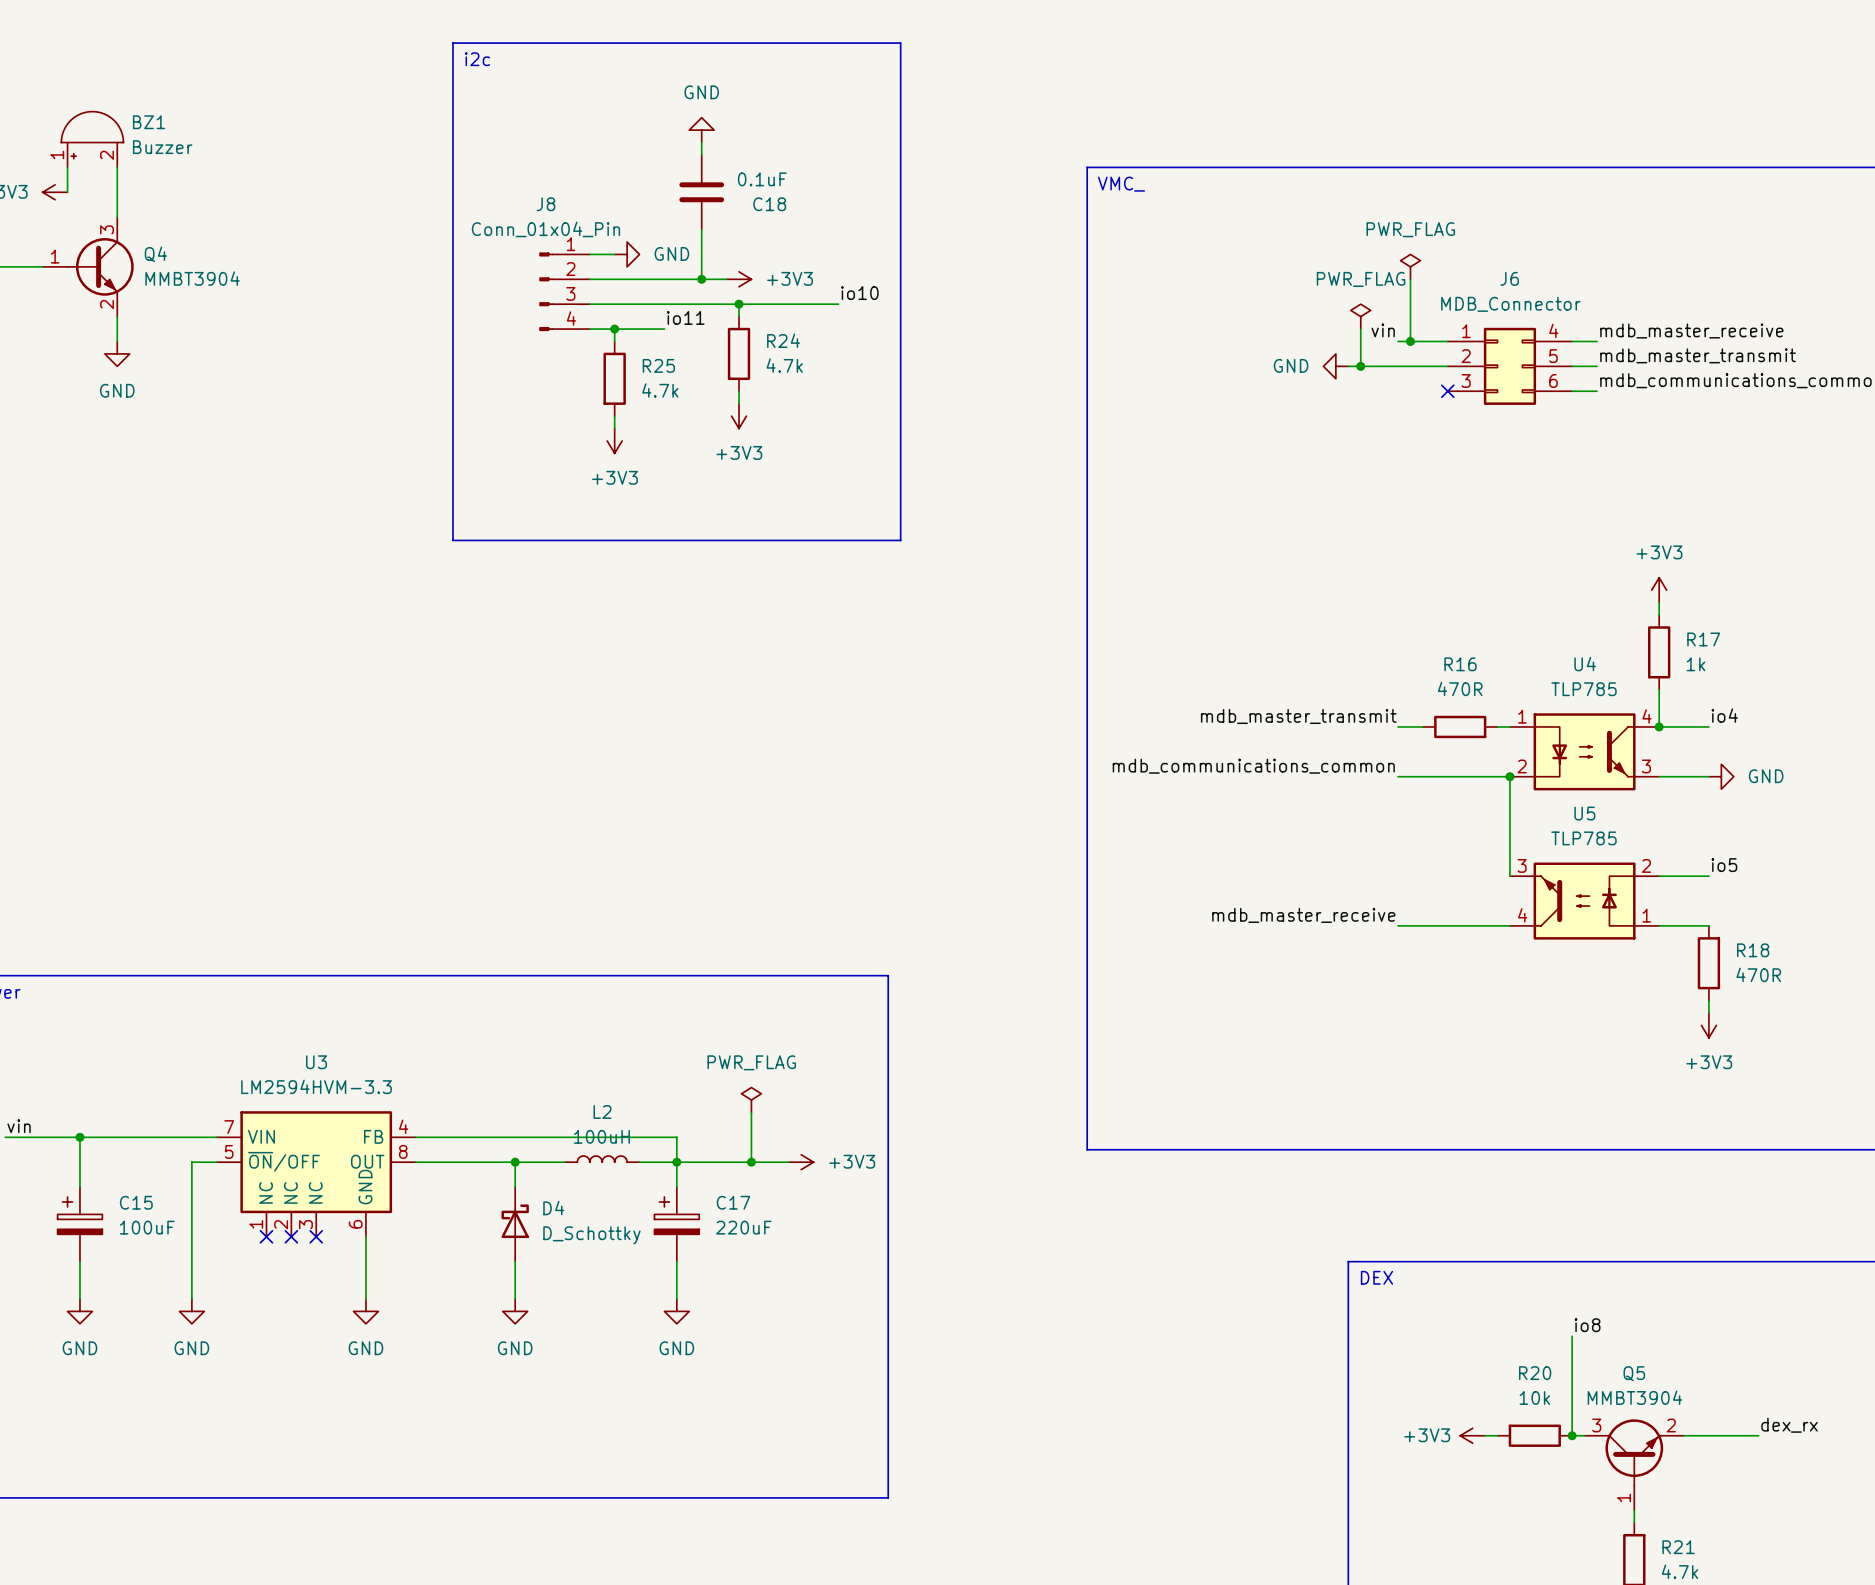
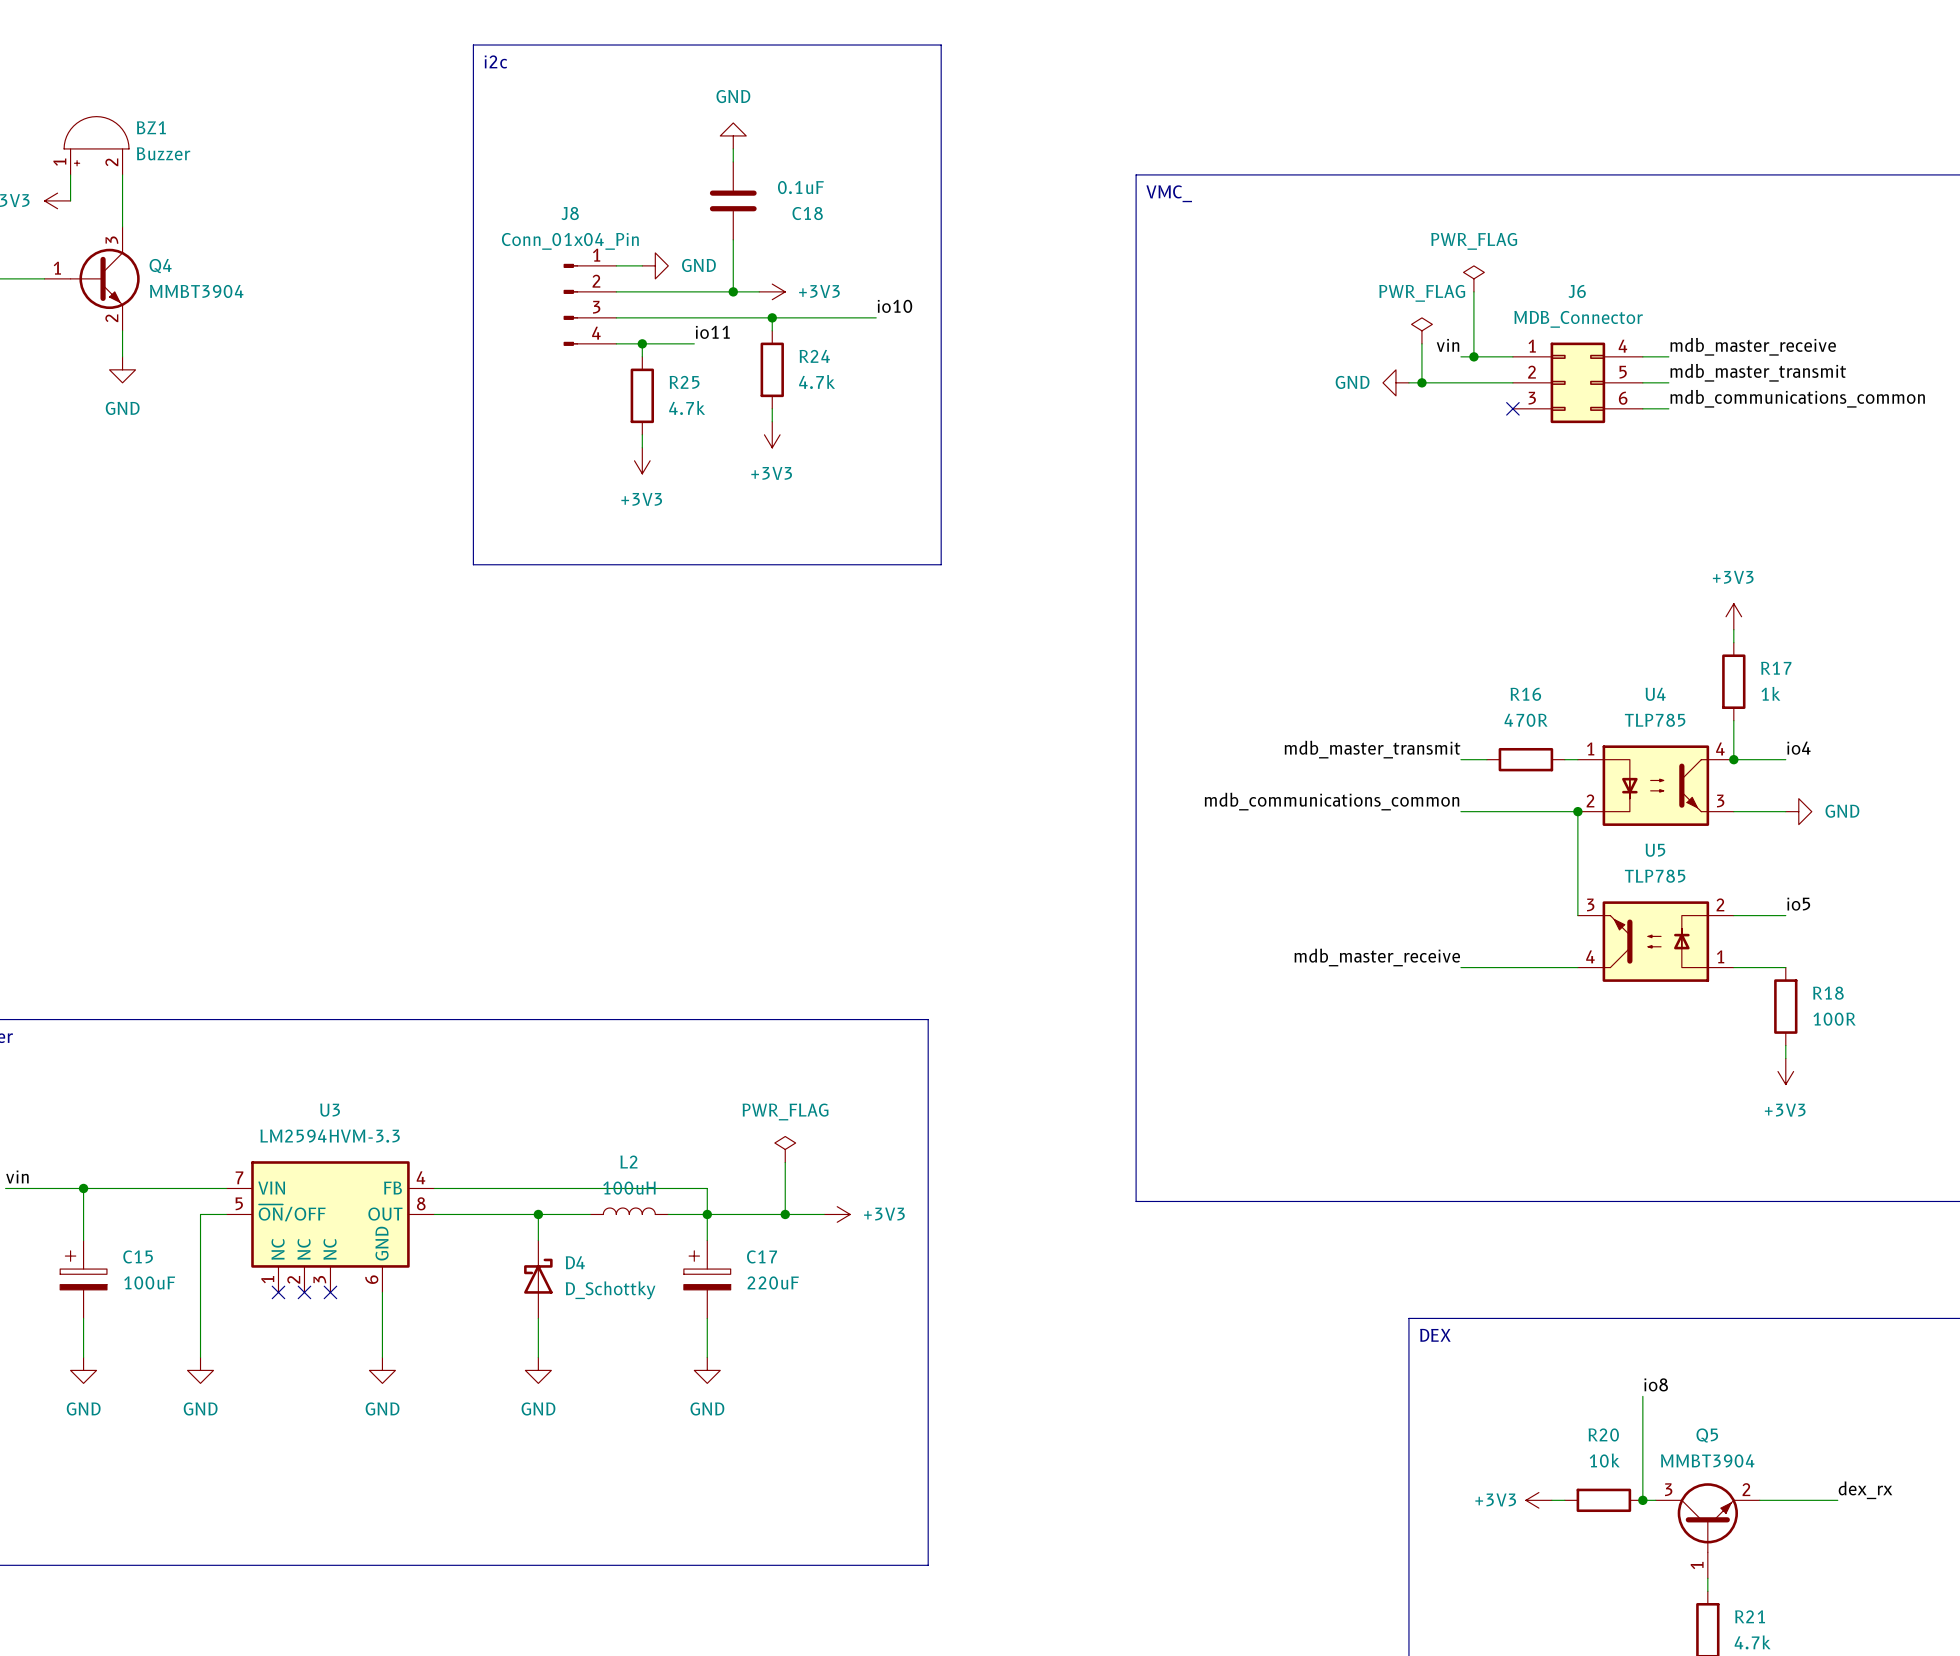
R18 value: 470R (1758, 974) -> 100R (1834, 1019)

